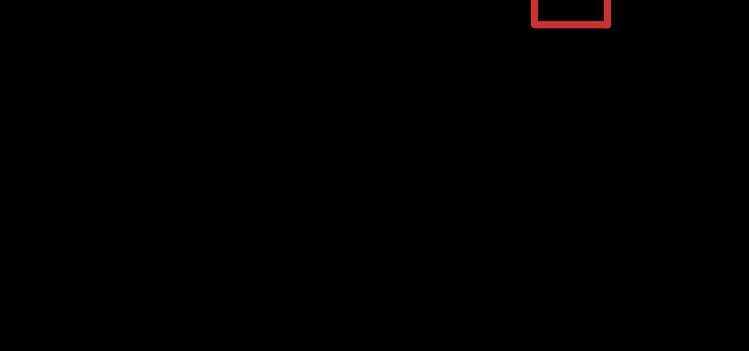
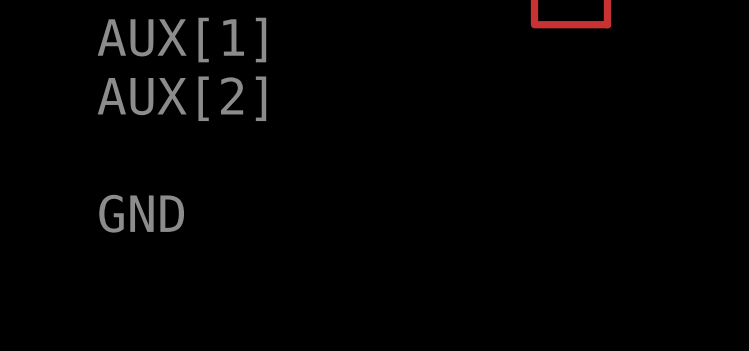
text: none -> AUX[1] (181, 40)
text: none -> AUX[2] (181, 98)
text: none -> GND (141, 213)

